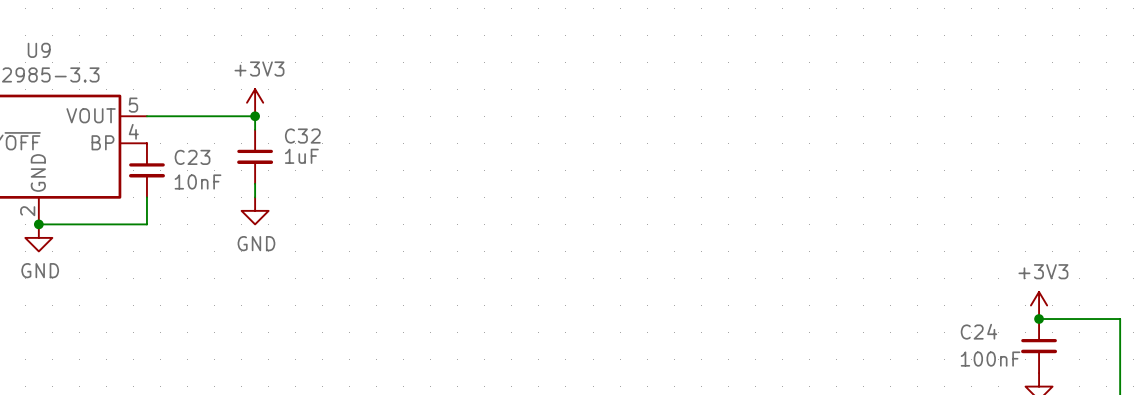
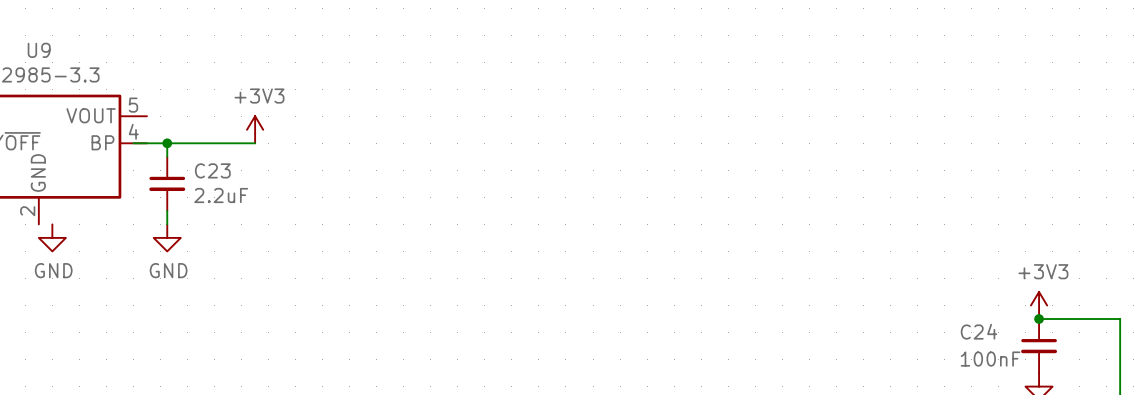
power symbol position: +3V3 (255, 102) -> +3V3 (255, 129)
wire: (146, 116) (255, 116) (255, 129) -> none
junction: (255, 116) -> none
wire: none -> (133, 143) (255, 143)
wire: none -> (167, 143) (167, 156)
junction: none -> (167, 143)
C32: 1uF (255, 156) -> none
C23 position: (146, 170) -> (167, 183)
C23 value: 10nF (198, 181) -> 2.2uF (221, 195)
wire: (255, 183) (255, 197) -> (167, 210) (167, 224)
wire: (146, 197) (146, 224) (38, 224) -> none
power symbol: GND (255, 210) -> none
junction: (38, 224) -> none
power symbol position: GND (38, 237) -> GND (52, 237)
power symbol: none -> GND (167, 237)

